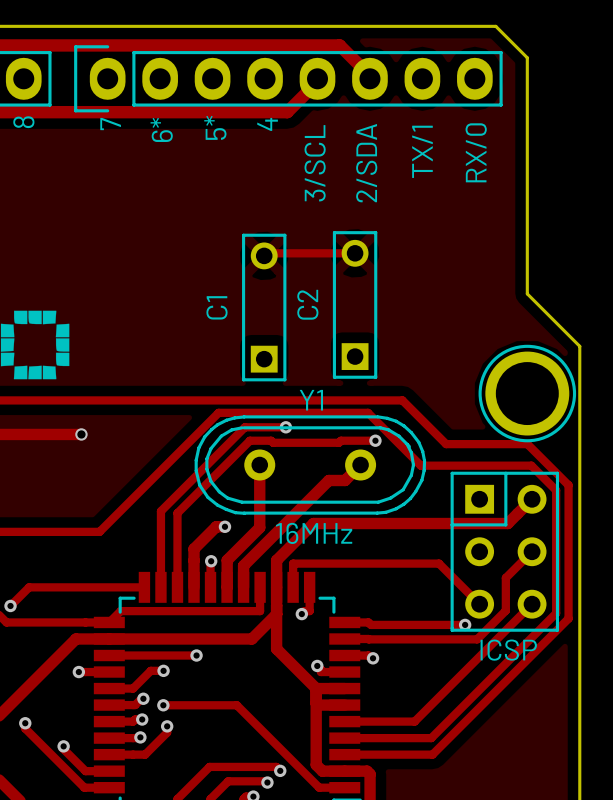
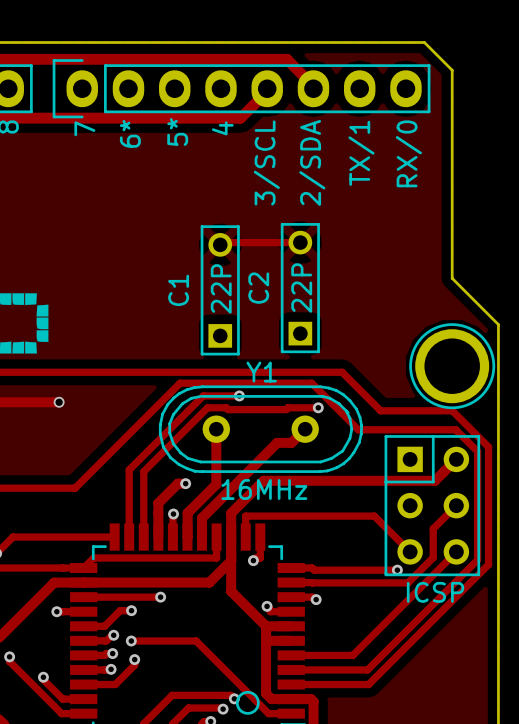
text: none -> 22P (301, 288)
text: none -> 22P (221, 288)
drawing: none -> [235, 690, 260, 715]

